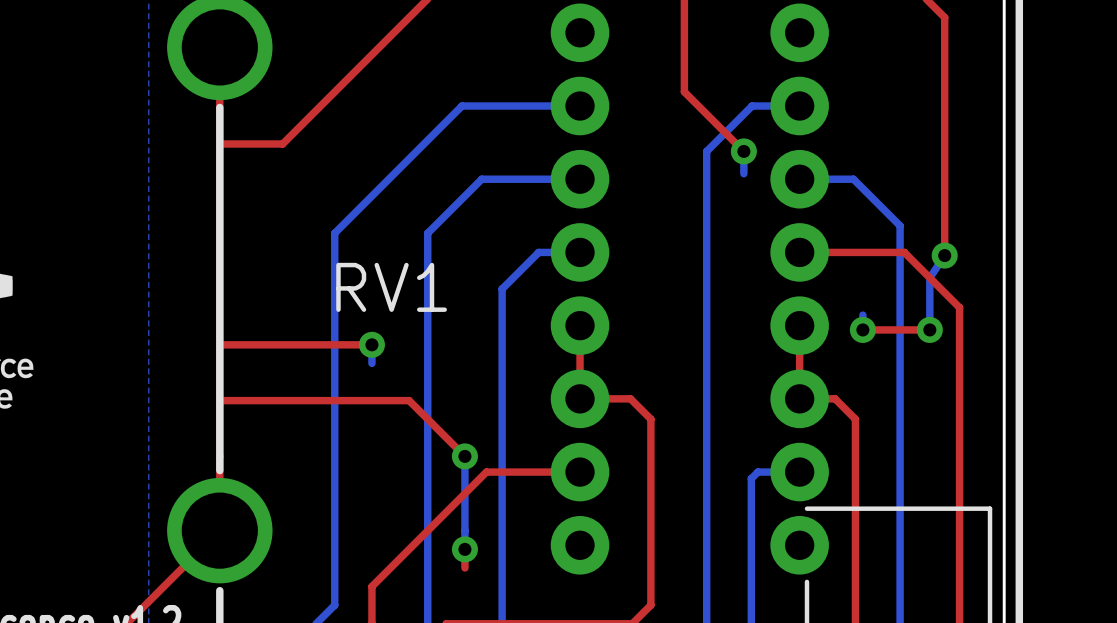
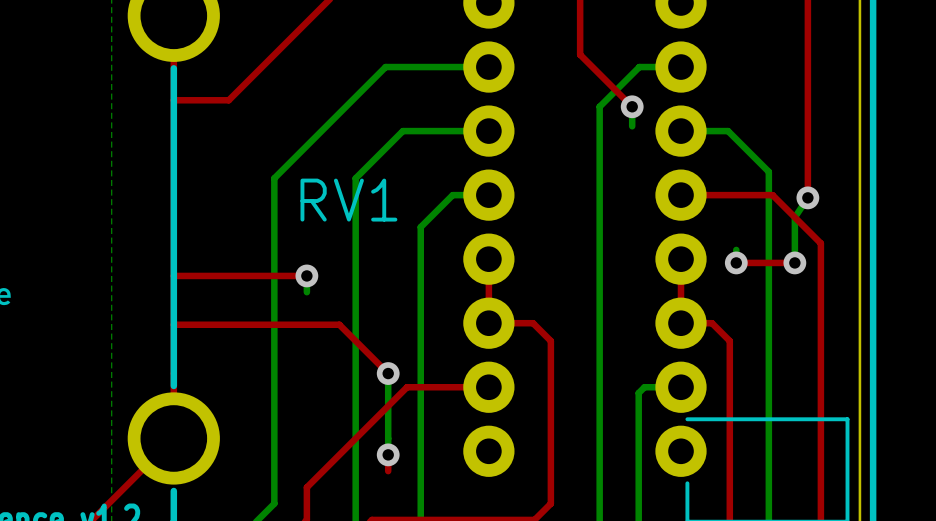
RV1 name position: RV1 (391, 287) -> RV1 (348, 200)

